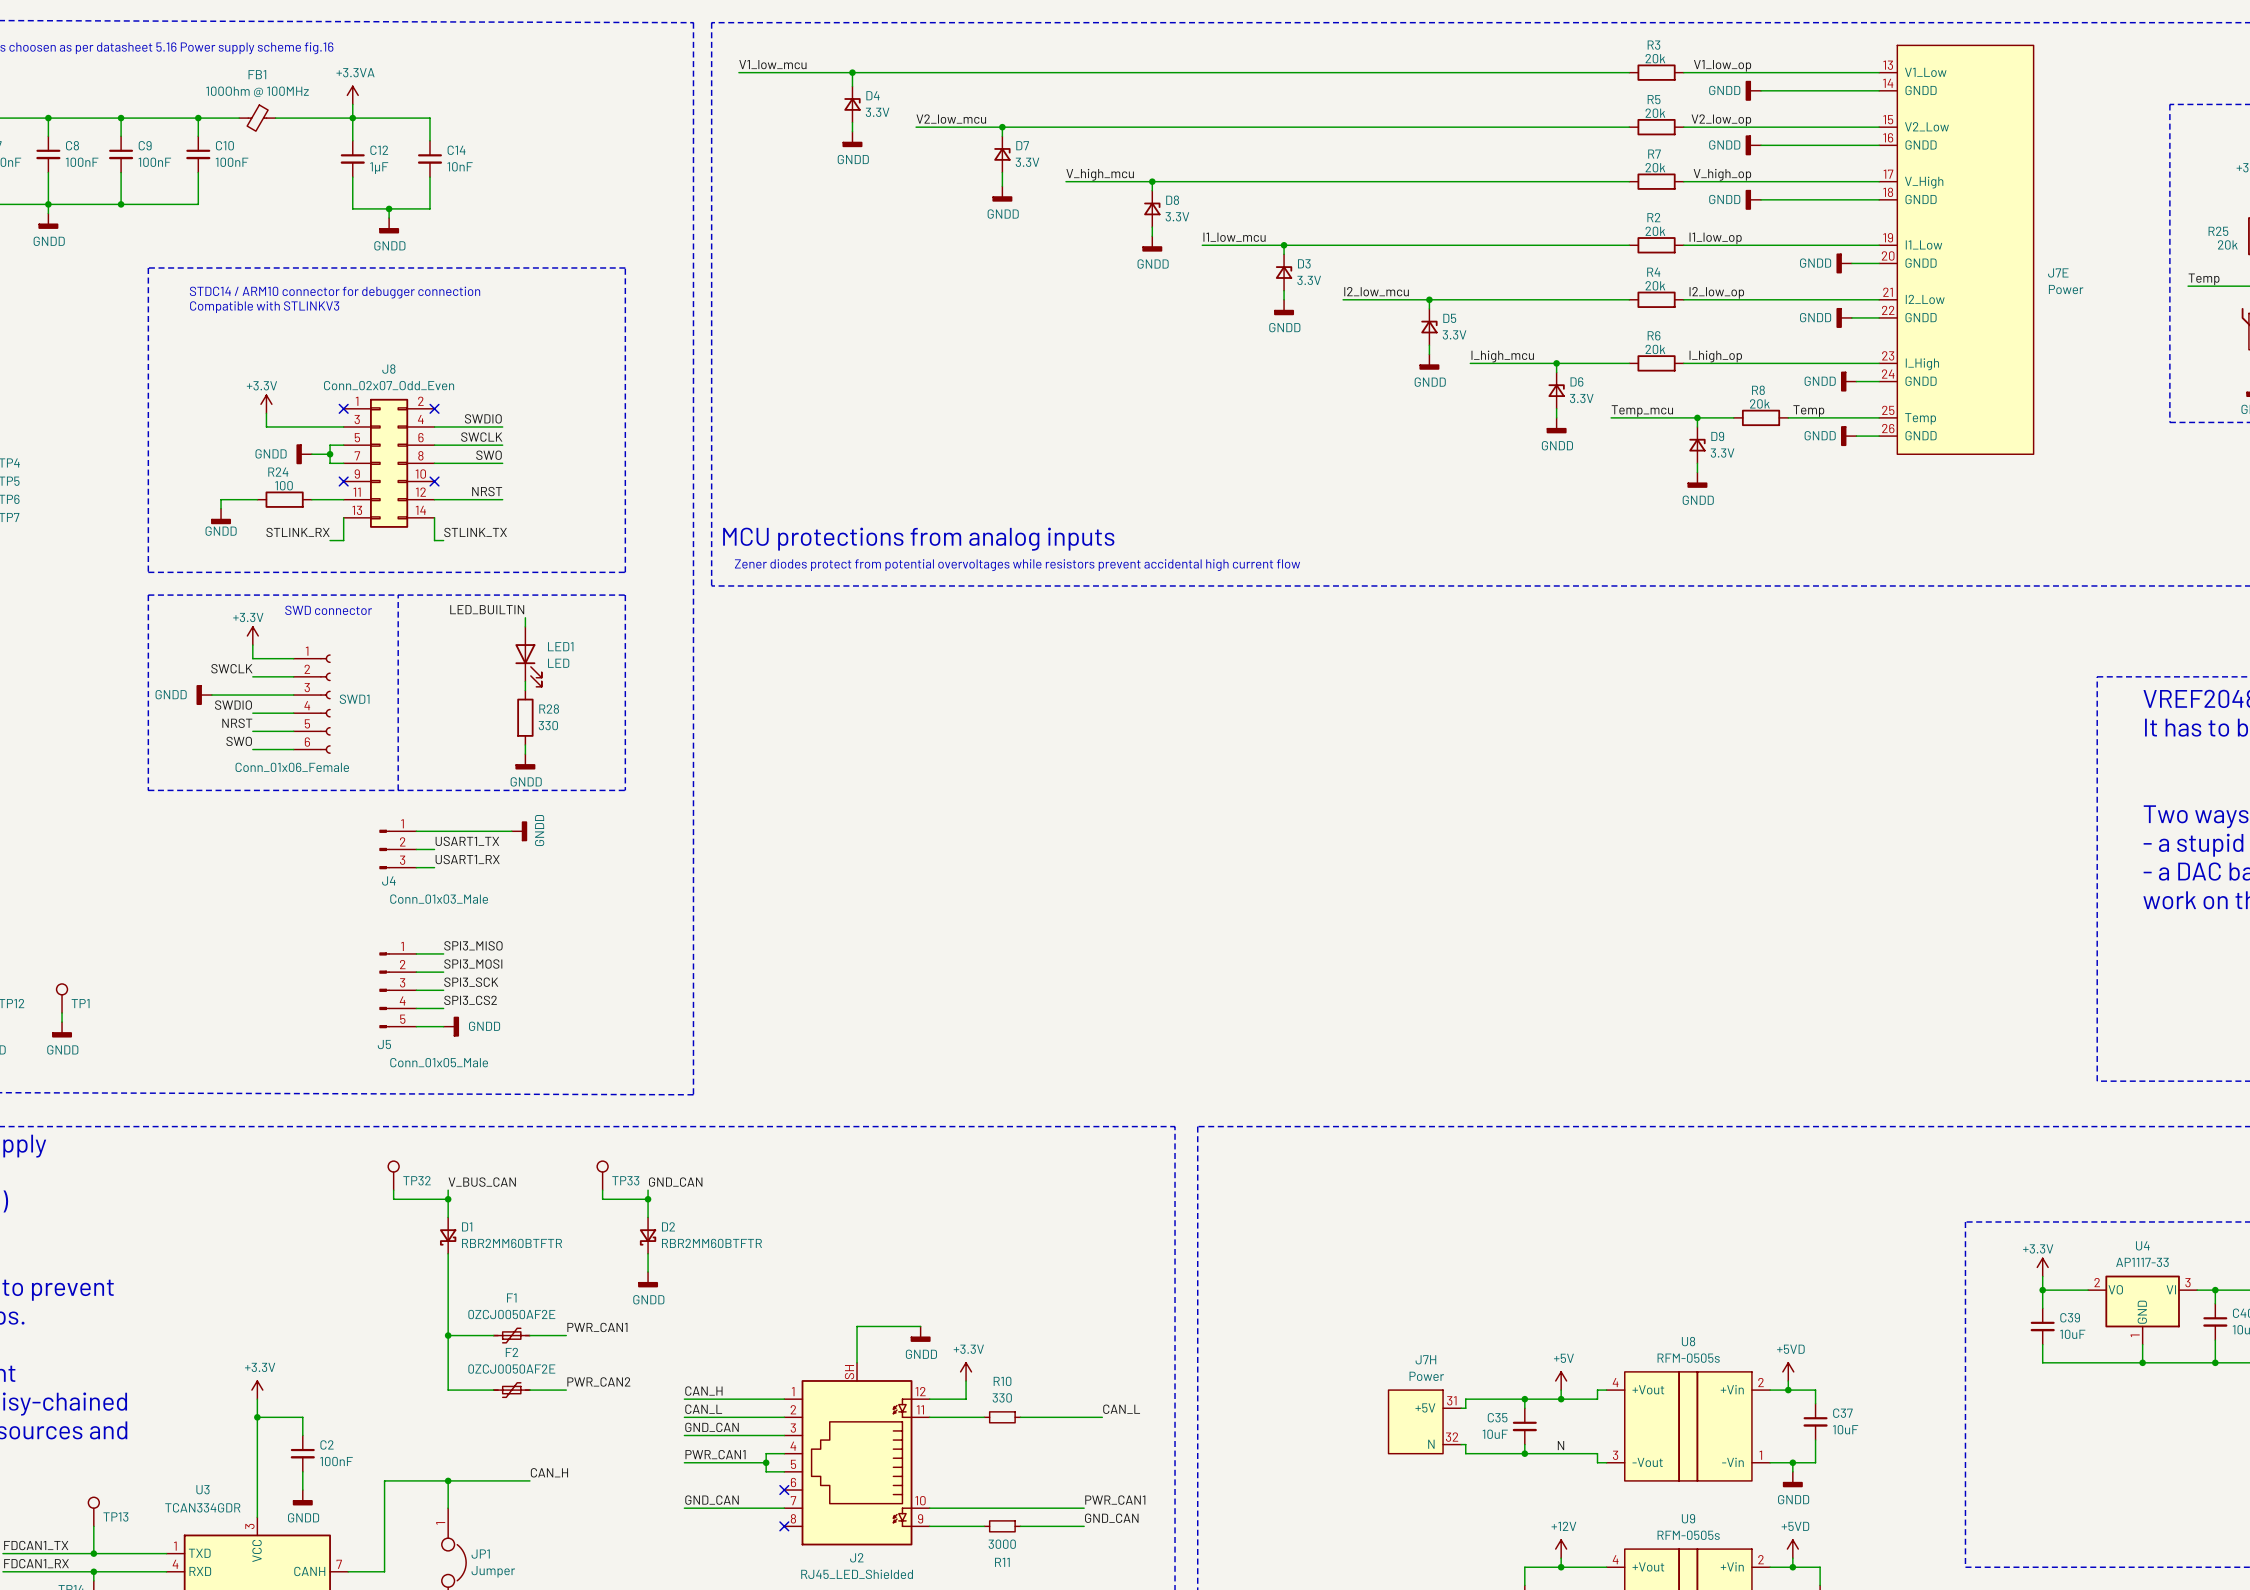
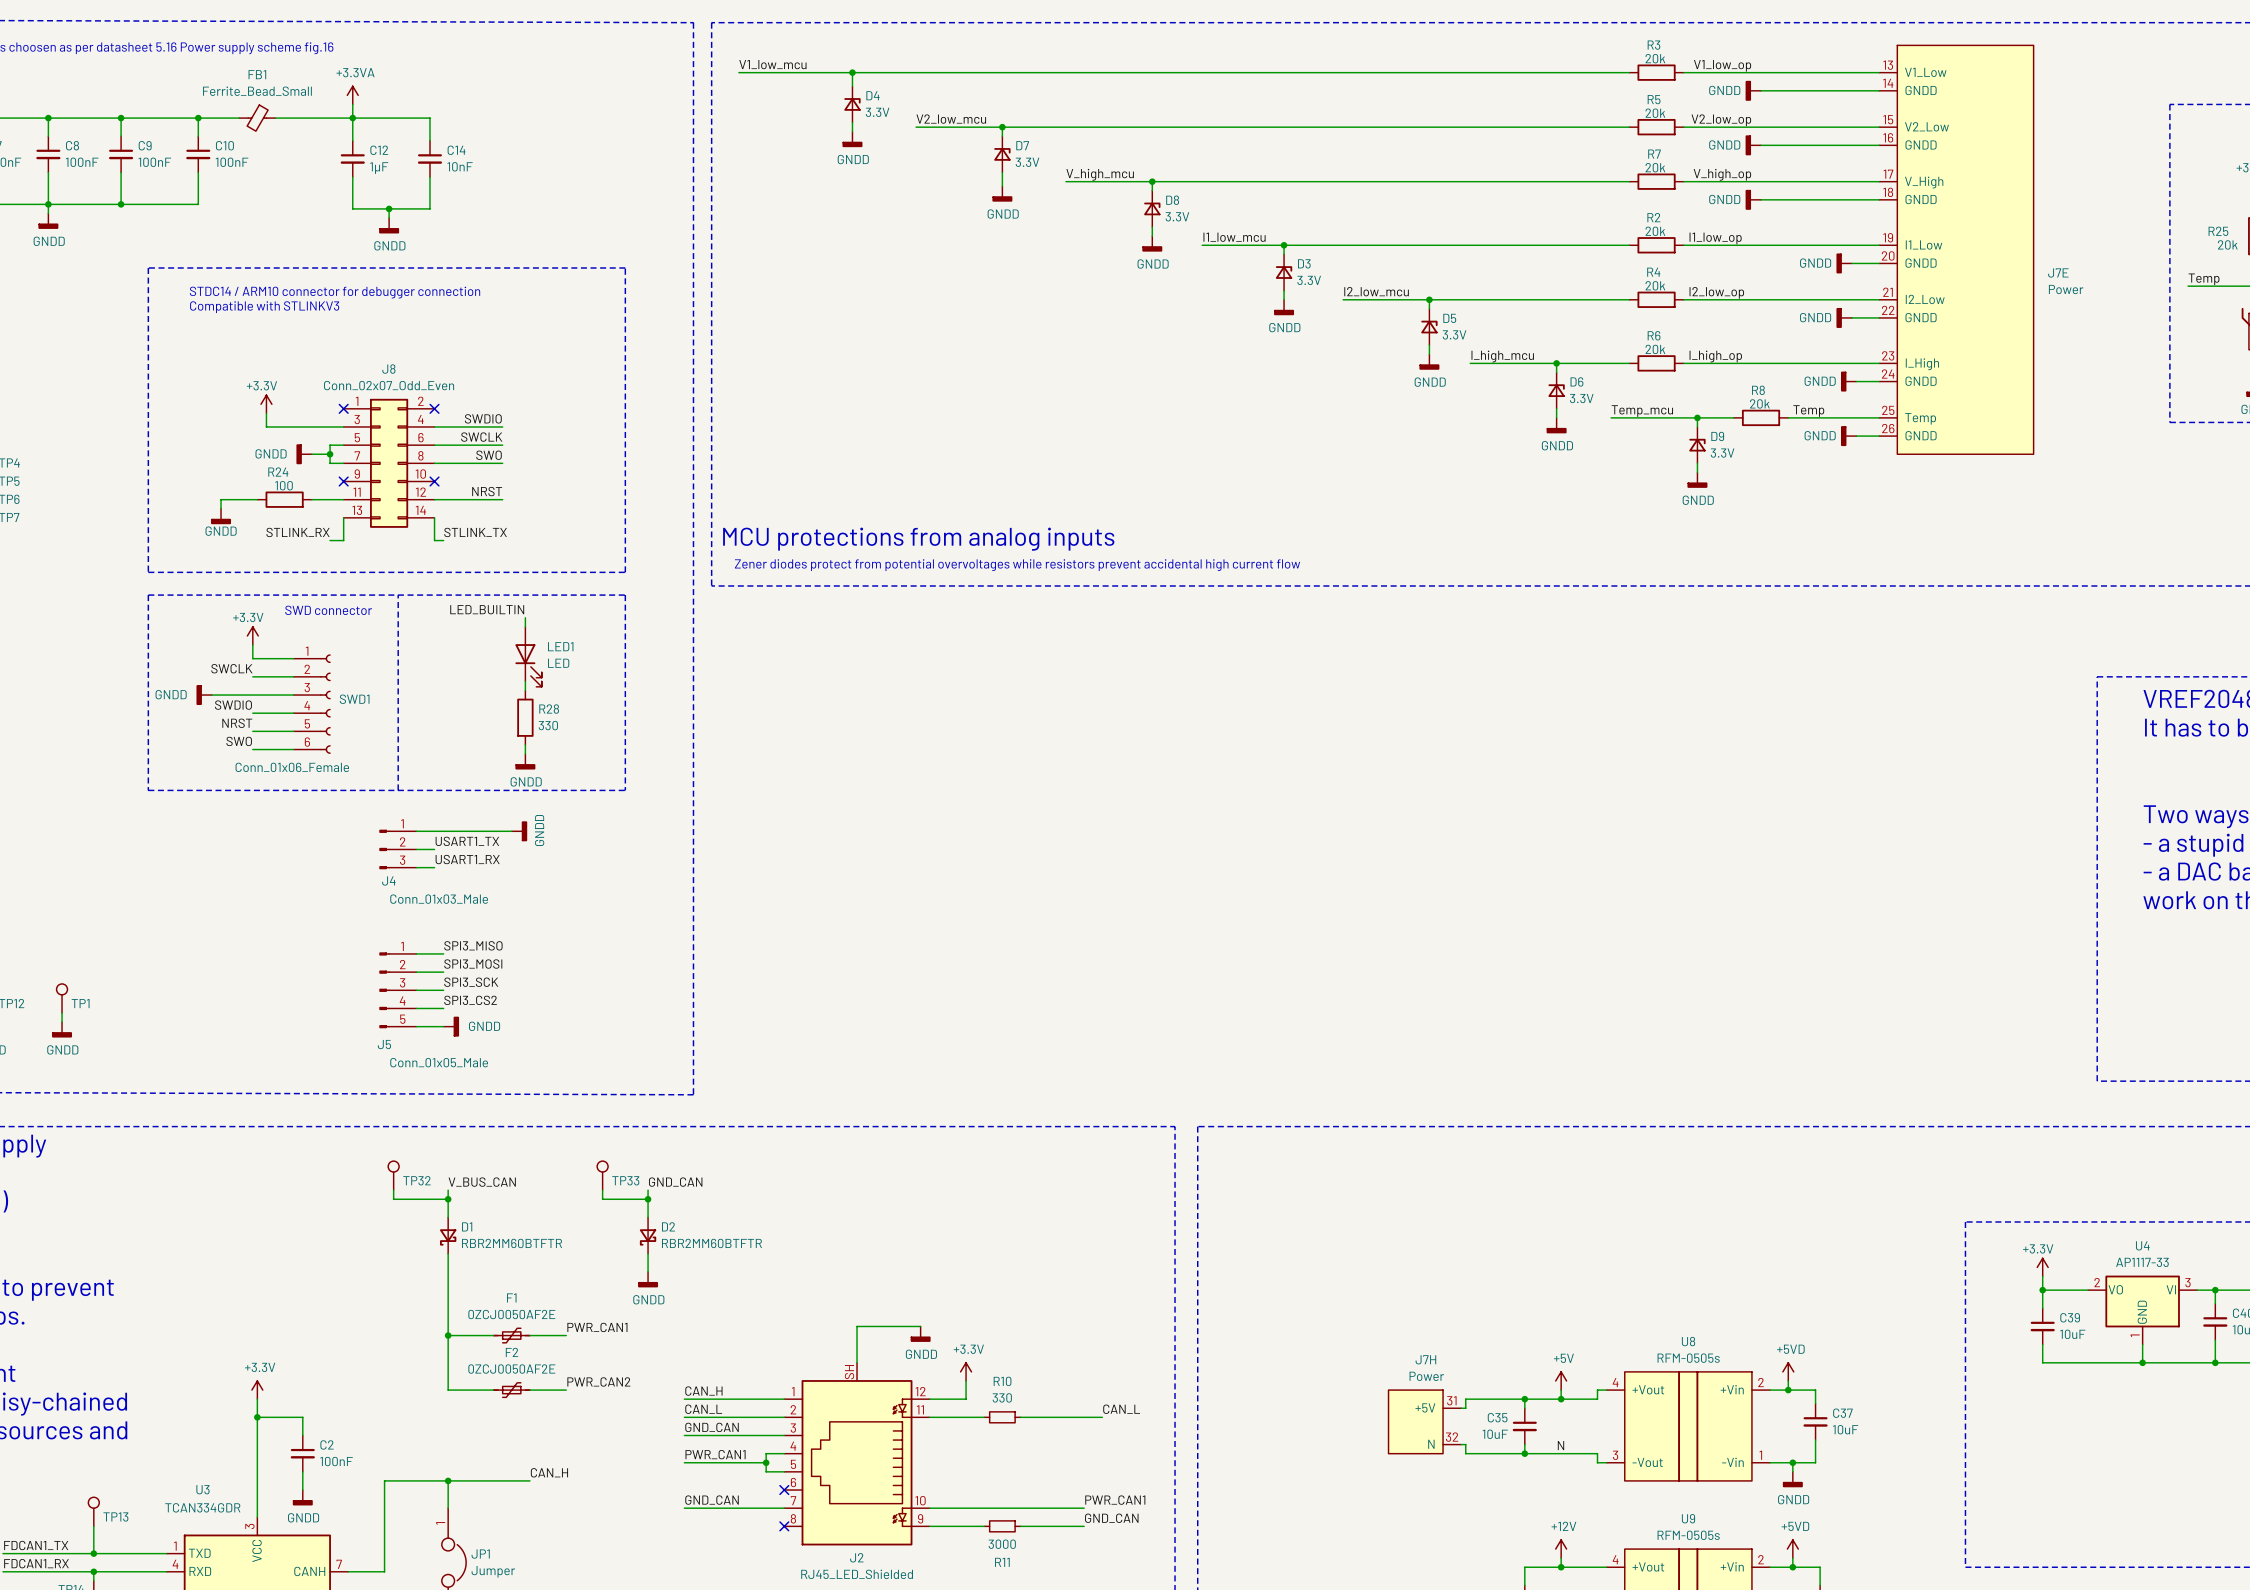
FB1 value: 100Ohm @ 100MHz (257, 91) -> Ferrite_Bead_Small (257, 91)

